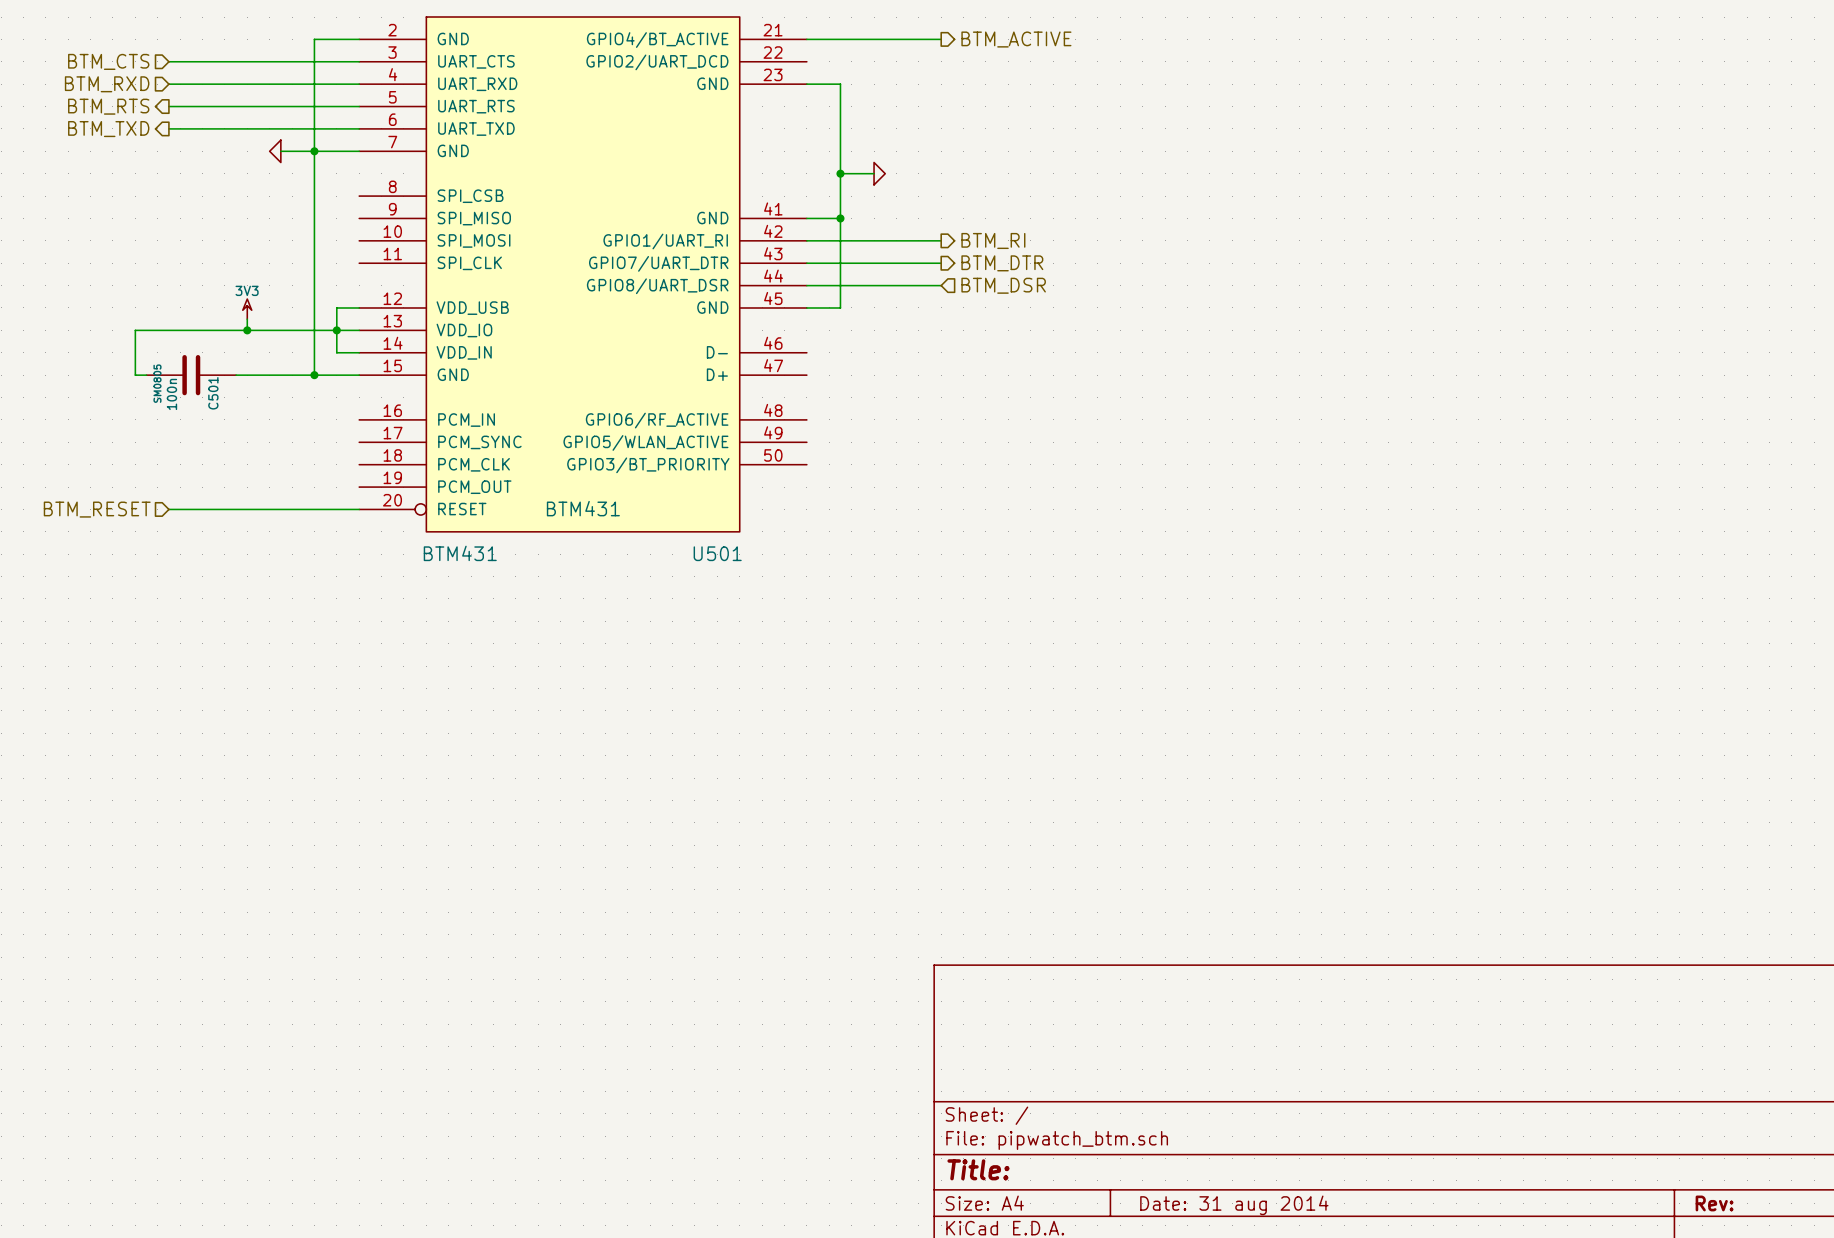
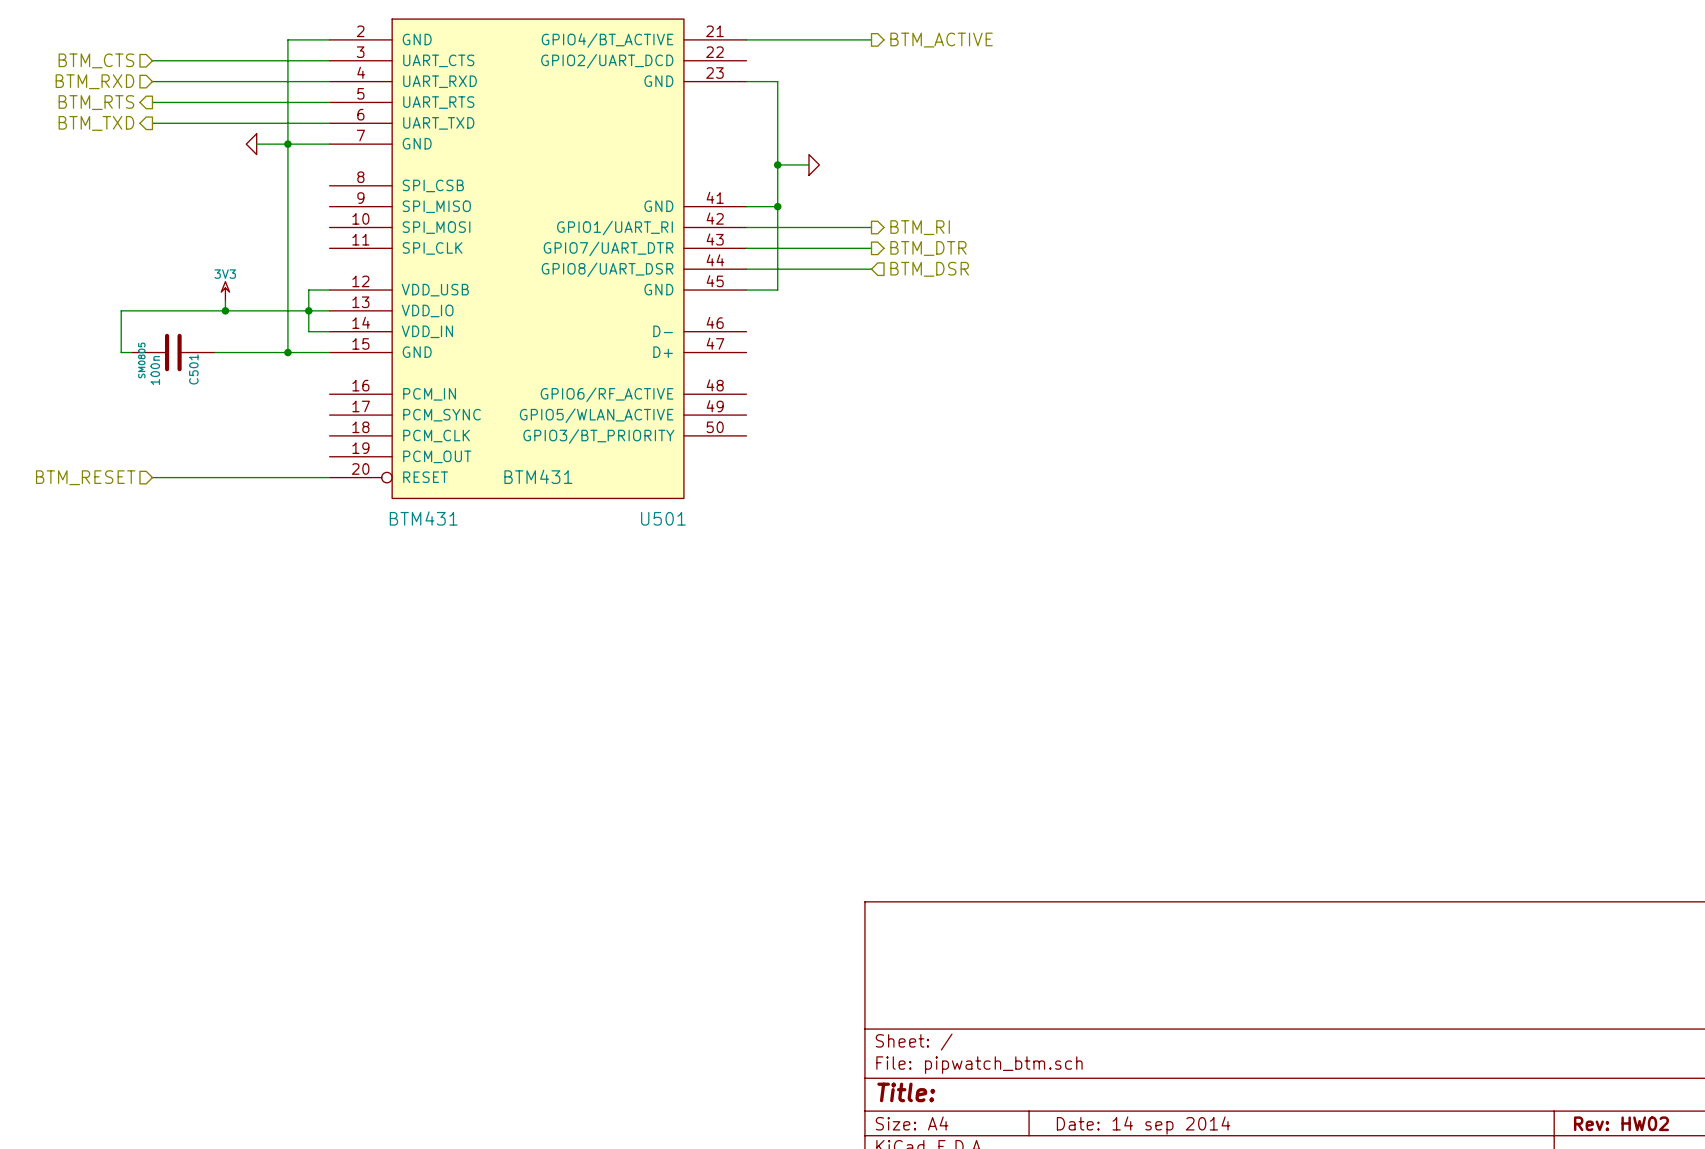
title block: Rev: (1714, 1203) -> Rev: HW02 (1621, 1123)
title block: Date: 31 aug 2014 (1234, 1205) -> Date: 14 sep 2014 (1143, 1125)

